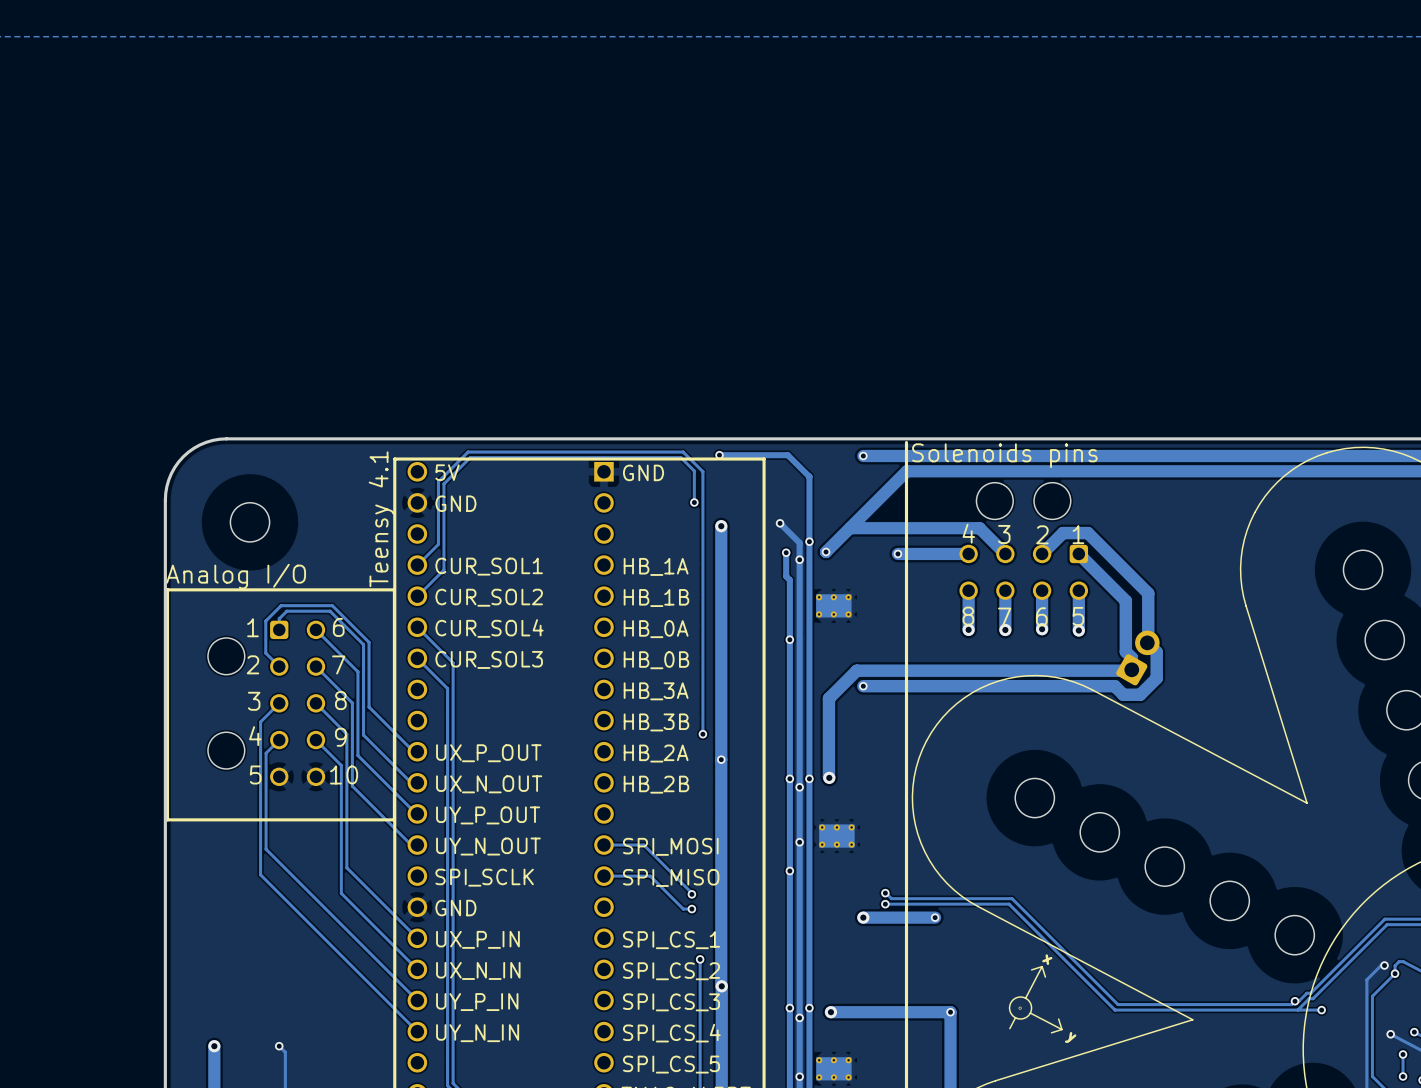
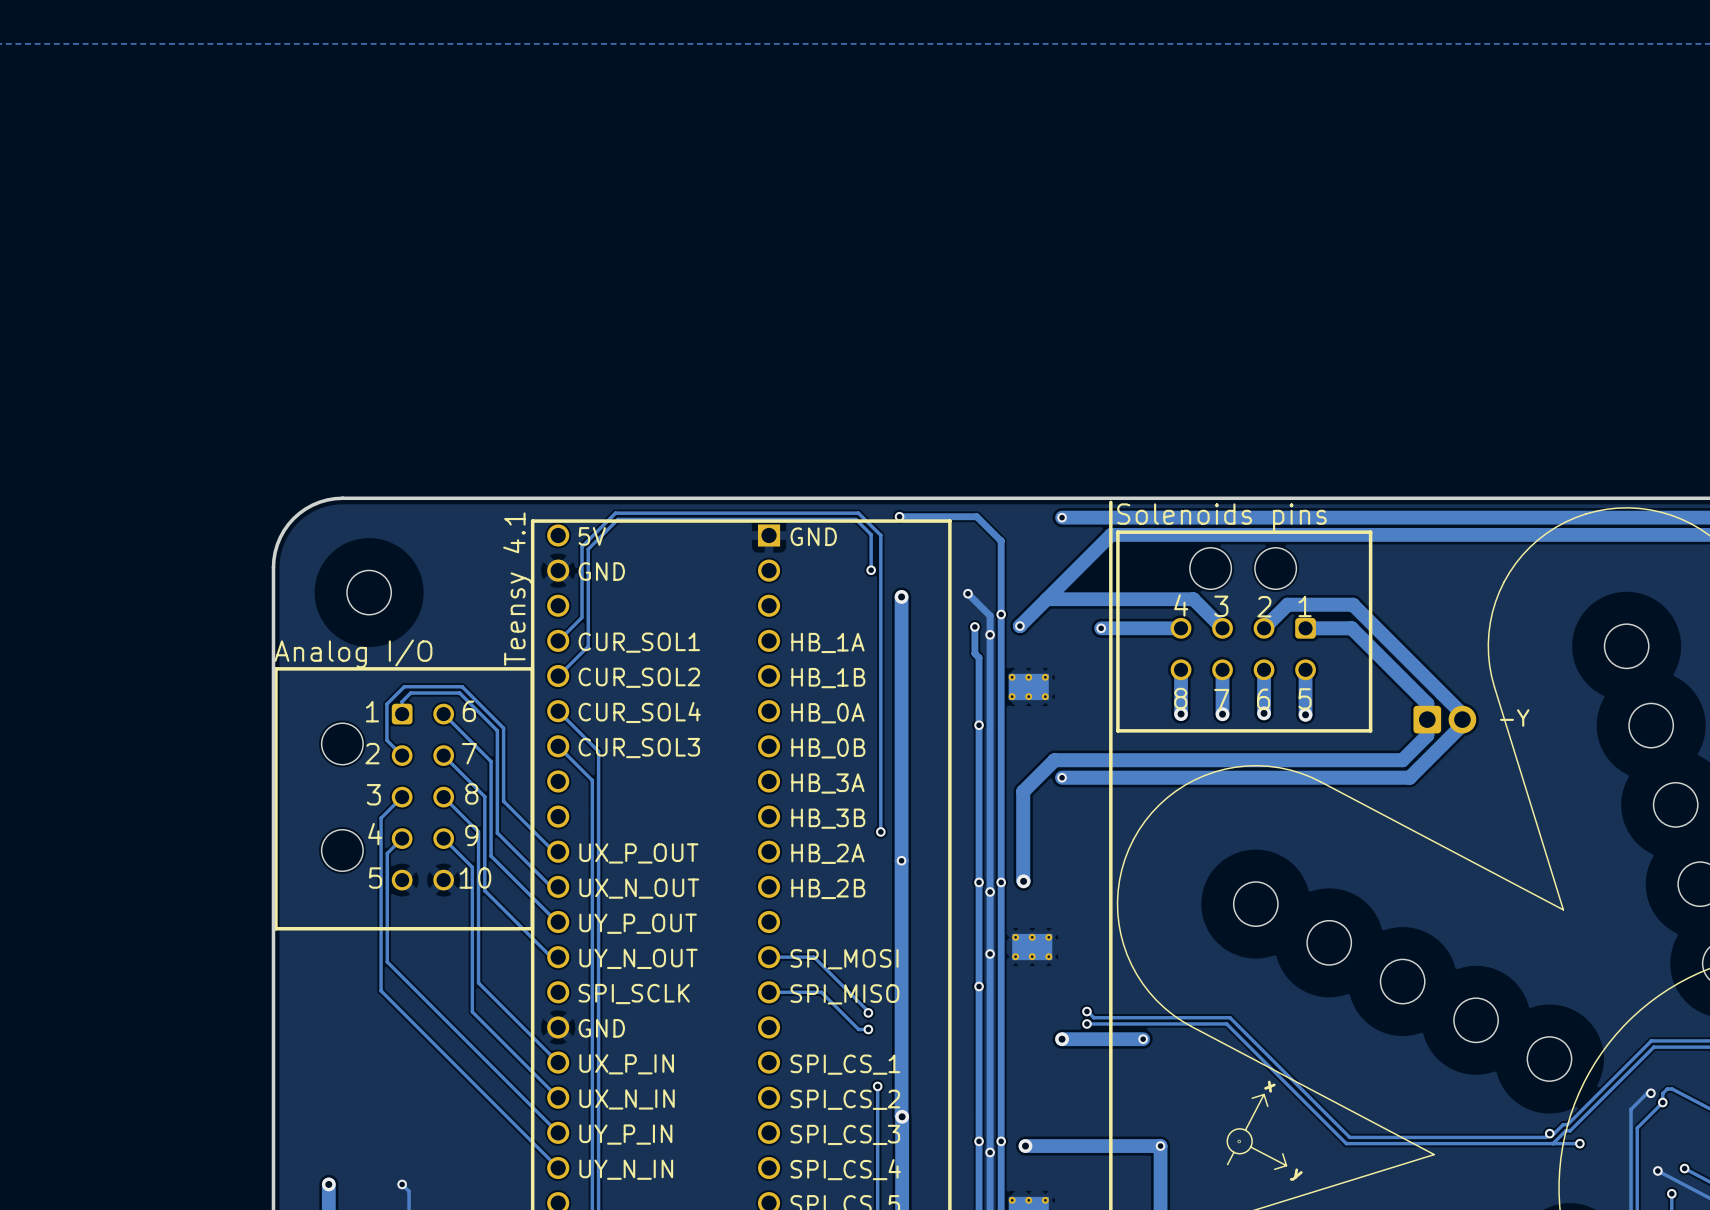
line: none -> (1370, 532) (1117, 532) (1117, 730) (1370, 730) (1370, 532)
track: (1087, 533) (1148, 593) (1147, 642) (1156, 652) (1156, 678) (1140, 694) (1123, 694) (1114, 686) -> (1315, 604) (1352, 604) (1462, 714) (1462, 725) (1409, 777) (1346, 777)
track: (1078, 553) (1125, 600) (1125, 651) (1131, 657) (1130, 670) -> (1305, 628) (1351, 628) (1427, 703) (1427, 735) (1402, 760) (1364, 760)
text: none -> -Y (1514, 718)
part: none -> (1444, 719)
part: (1137, 658) -> none

